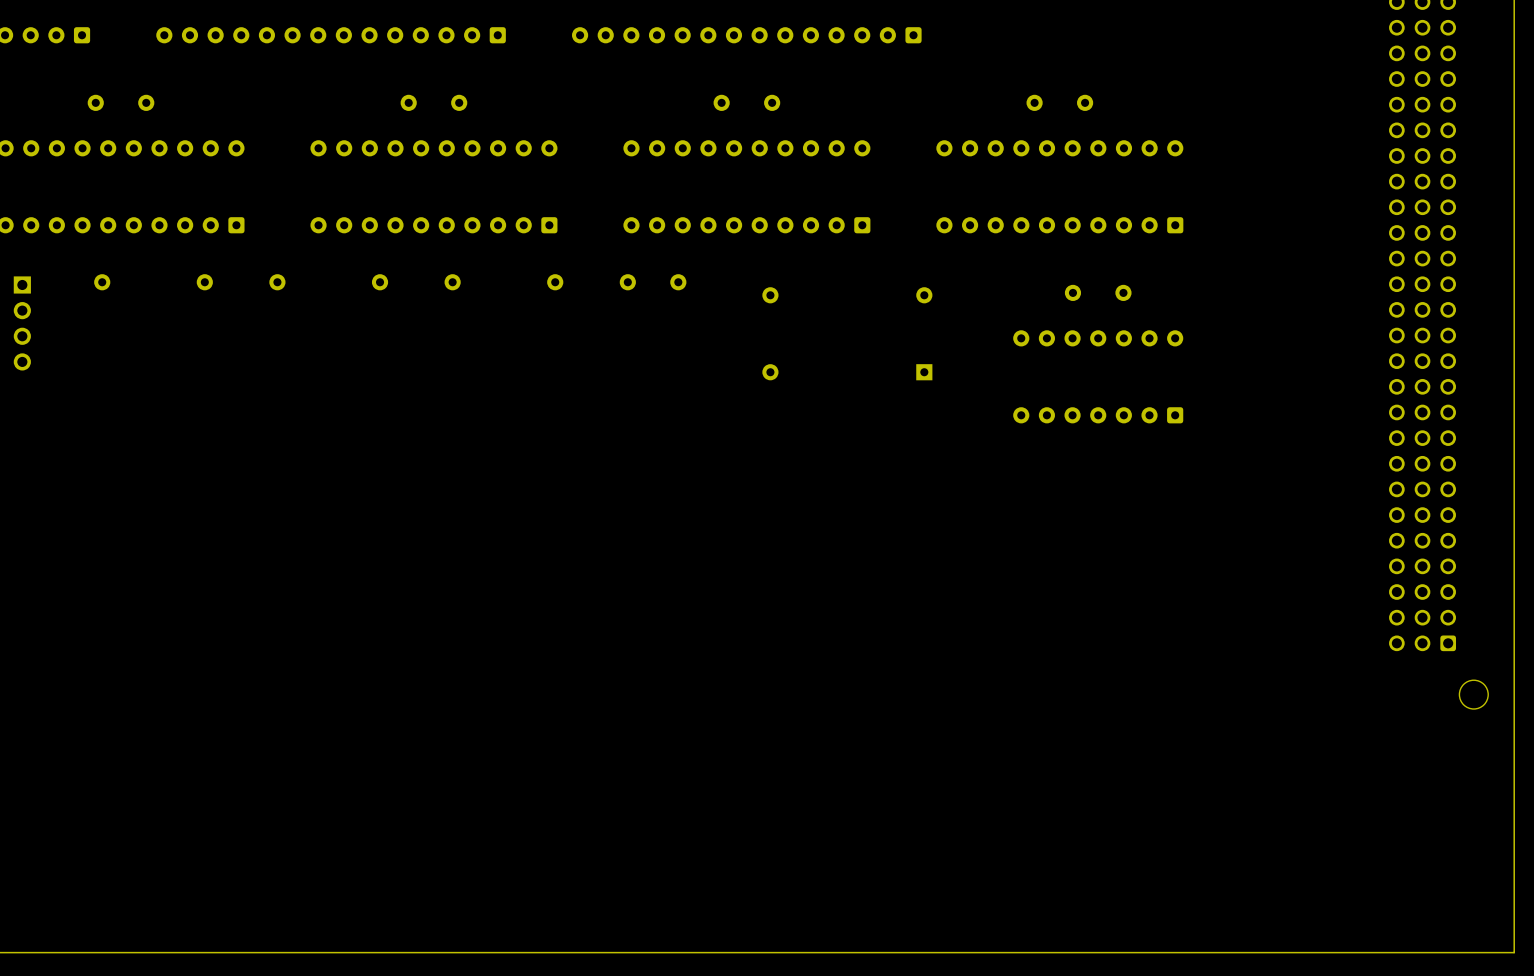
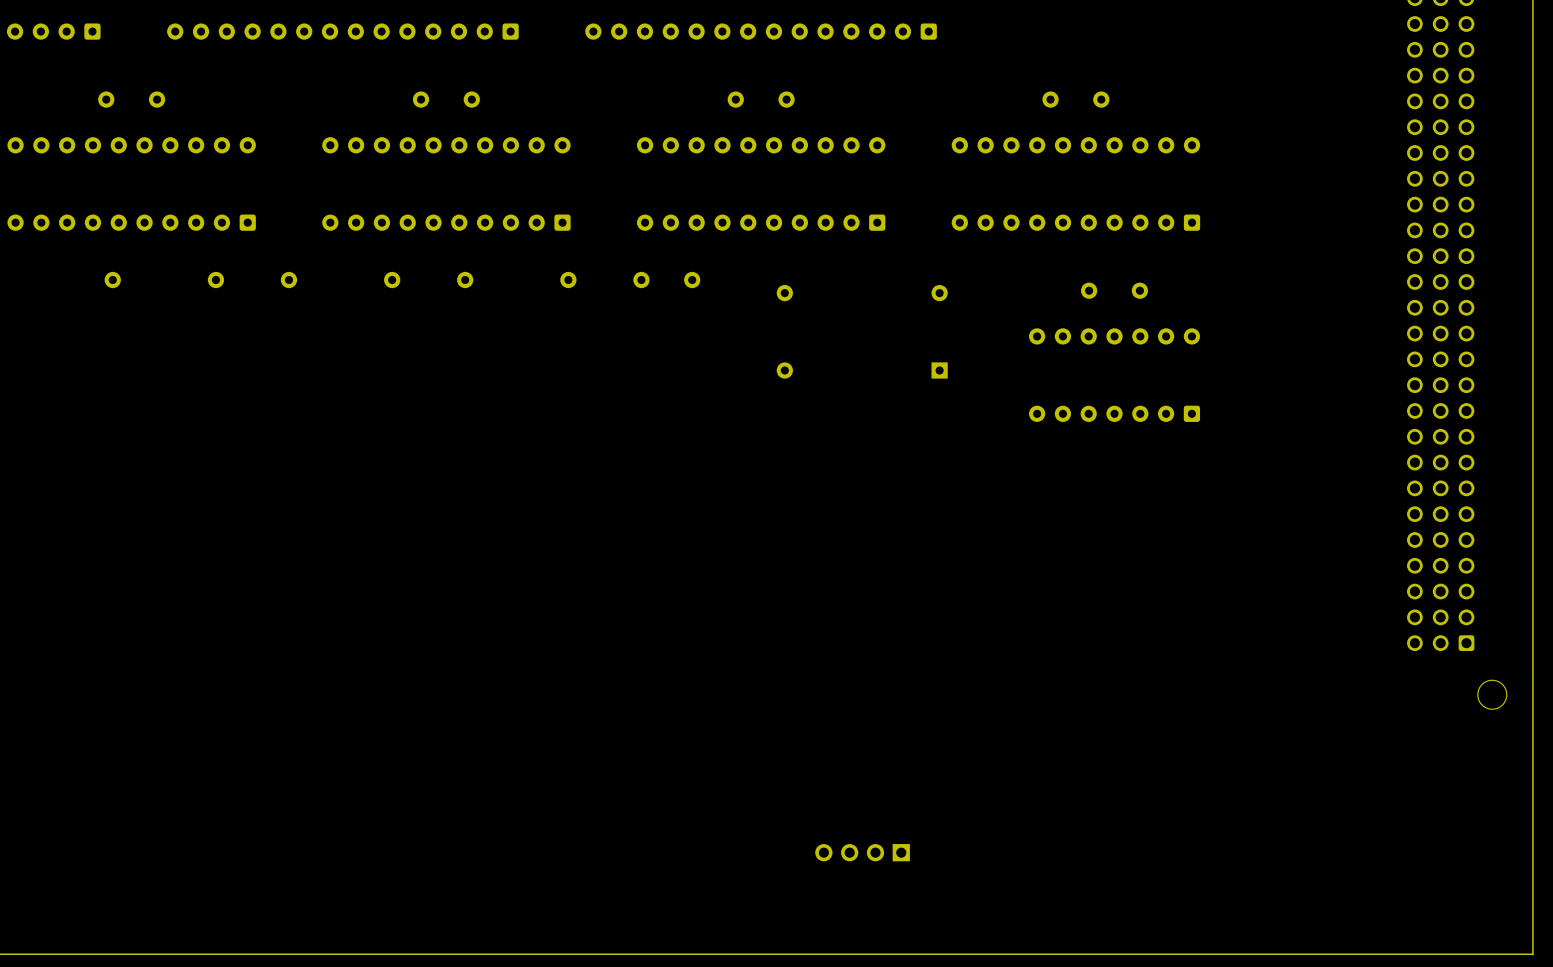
part: (22, 323) -> none
part: none -> (862, 852)

